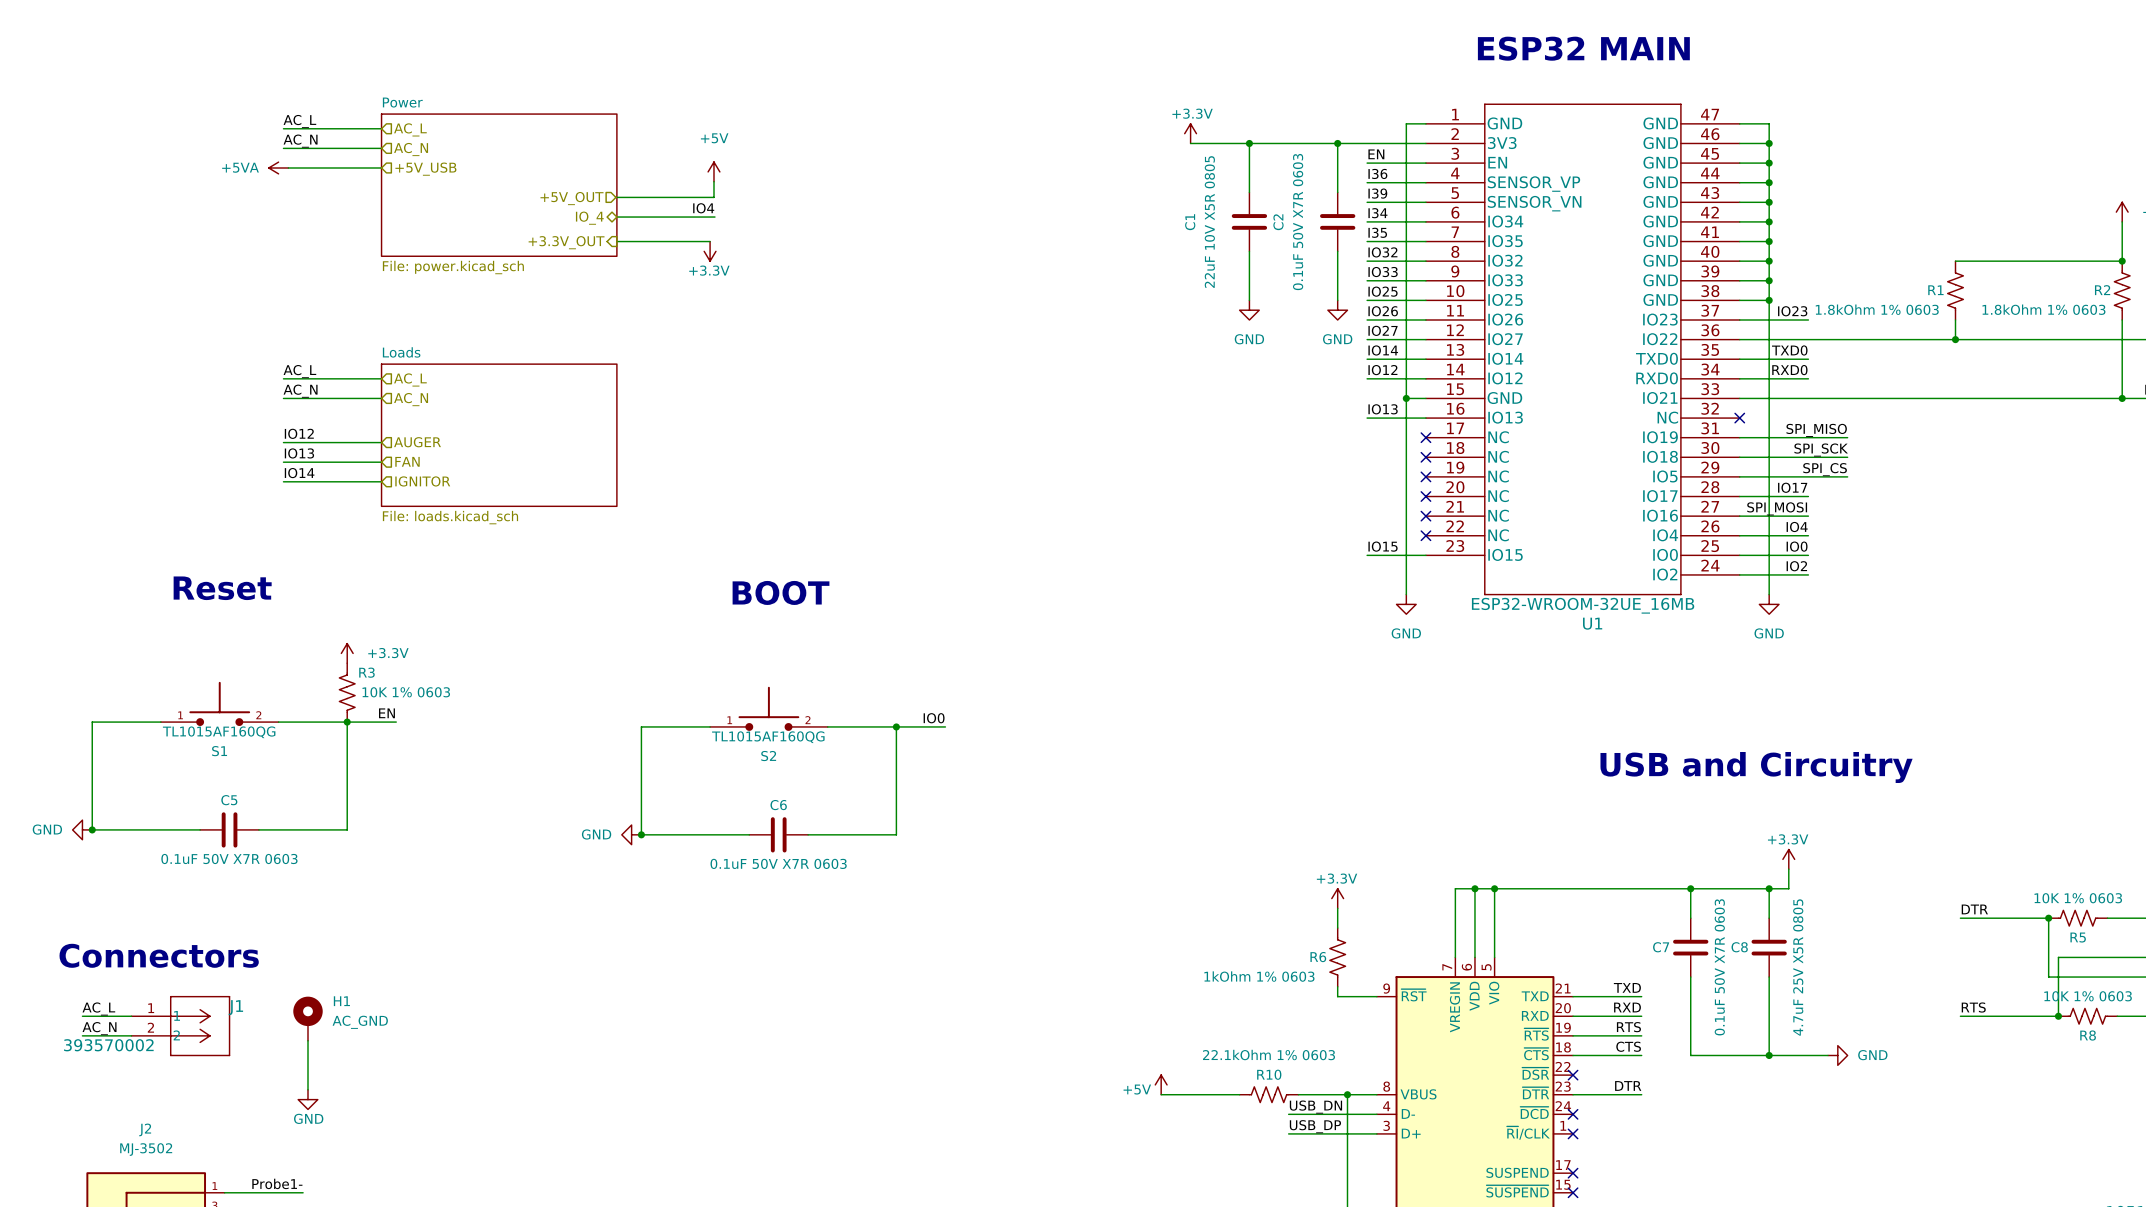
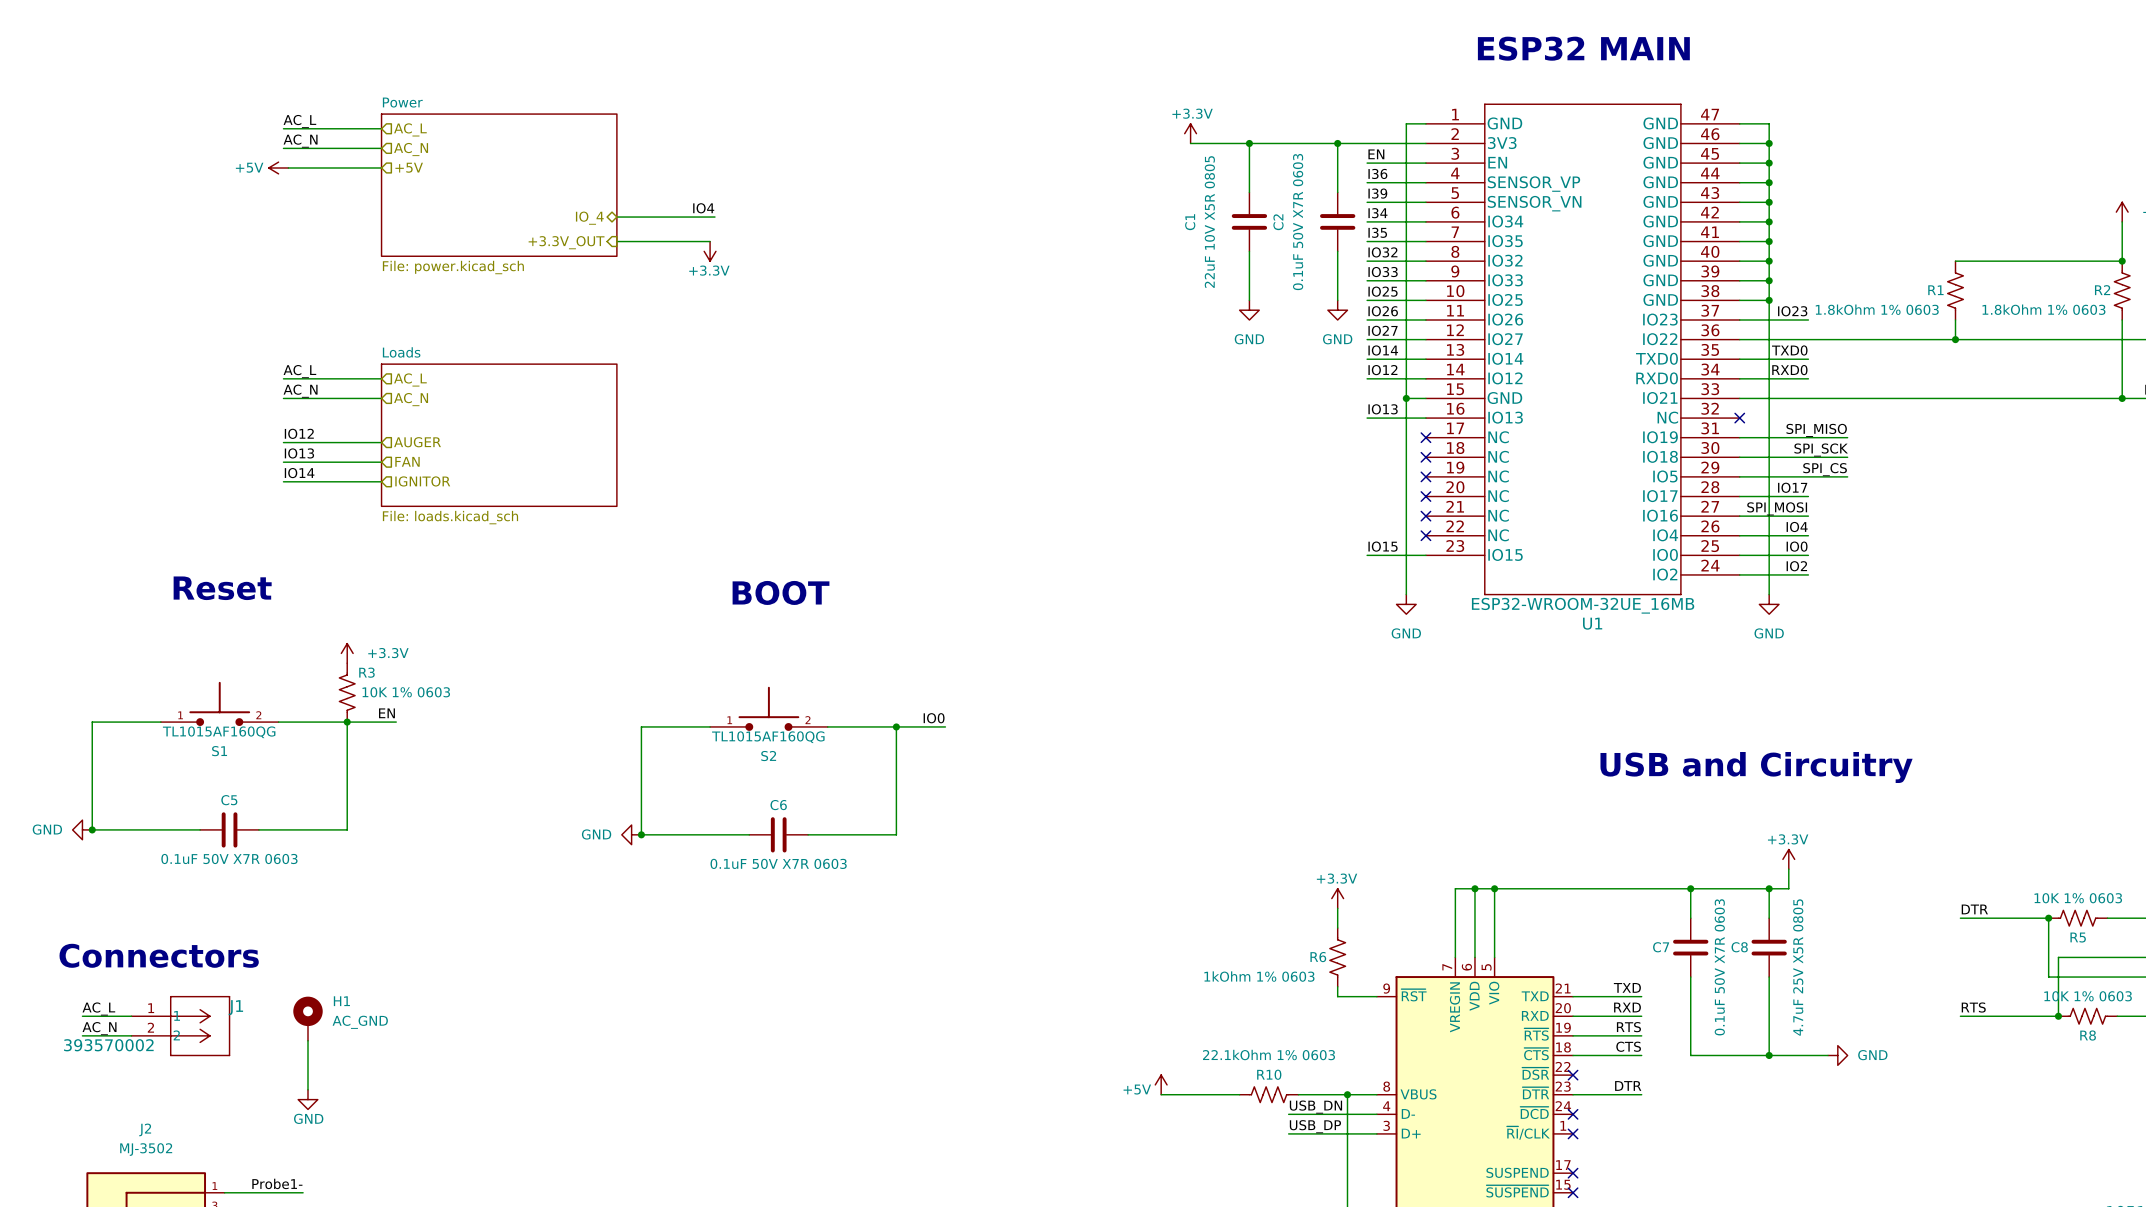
power symbol: +5VA (278, 167) -> +5V (278, 167)
hierarchical label: +5V_USB (425, 169) -> +5V (409, 167)
power symbol: +5V (713, 171) -> none
wire: (713, 181) (713, 197) (615, 197) -> none
hierarchical label: +5V_OUT (572, 198) -> none

